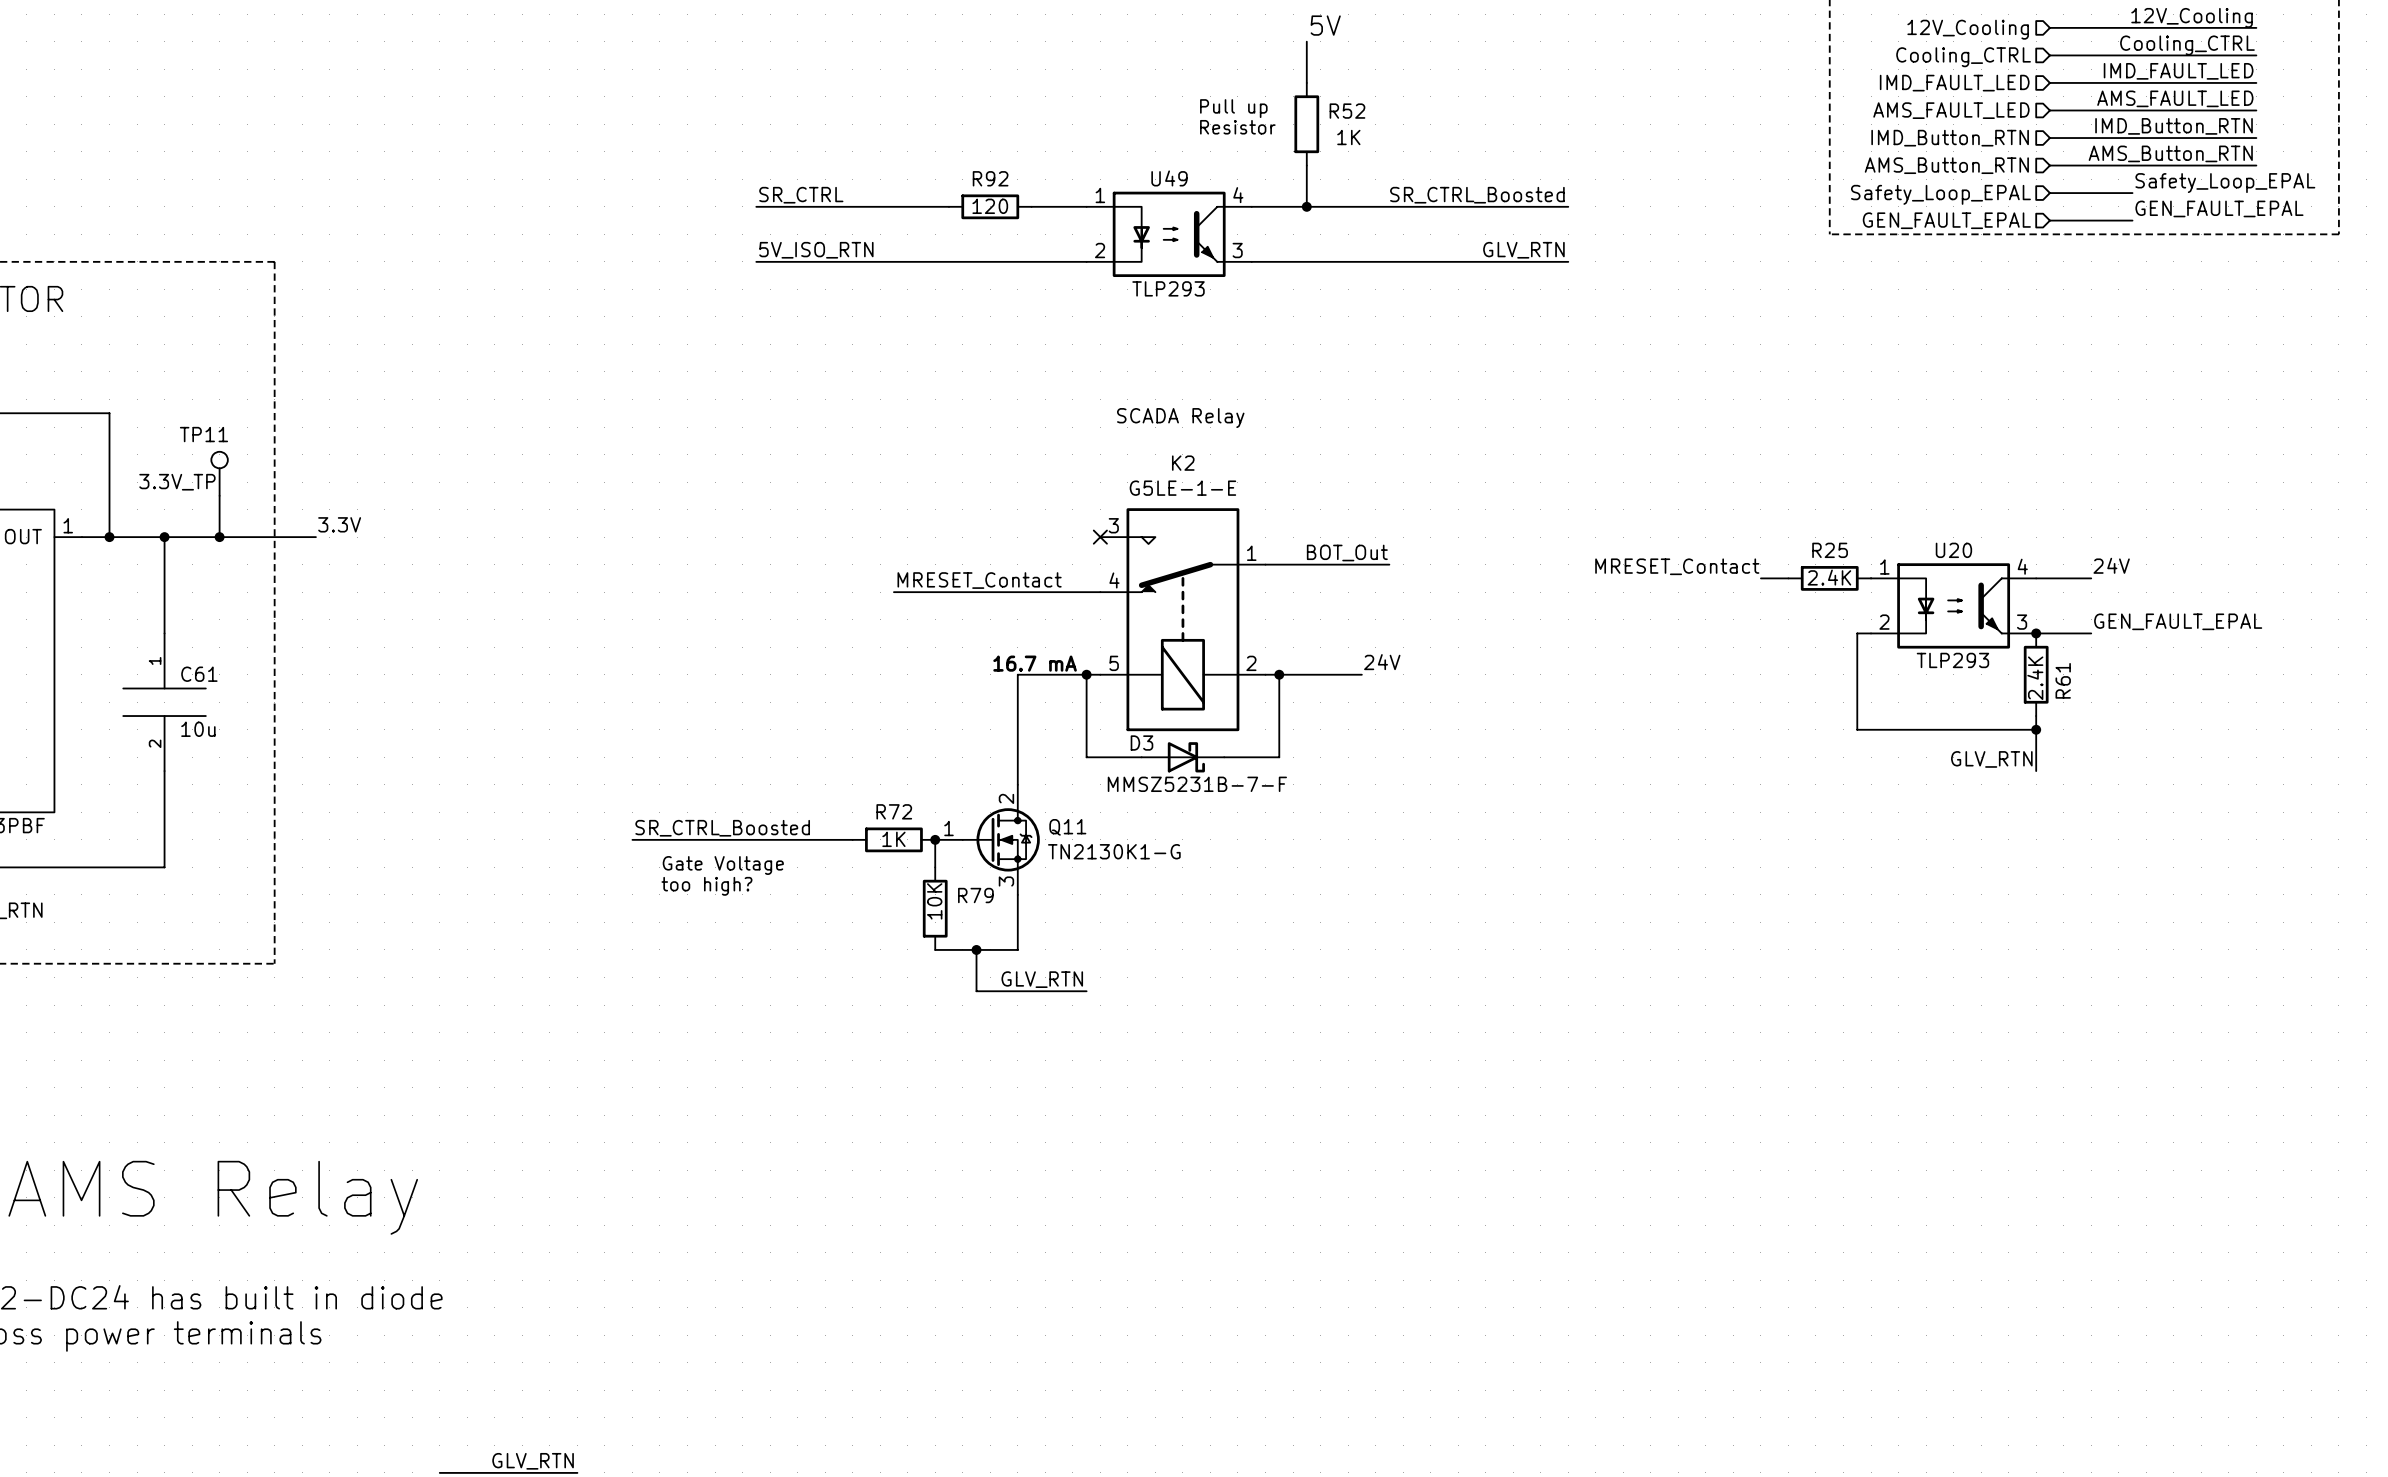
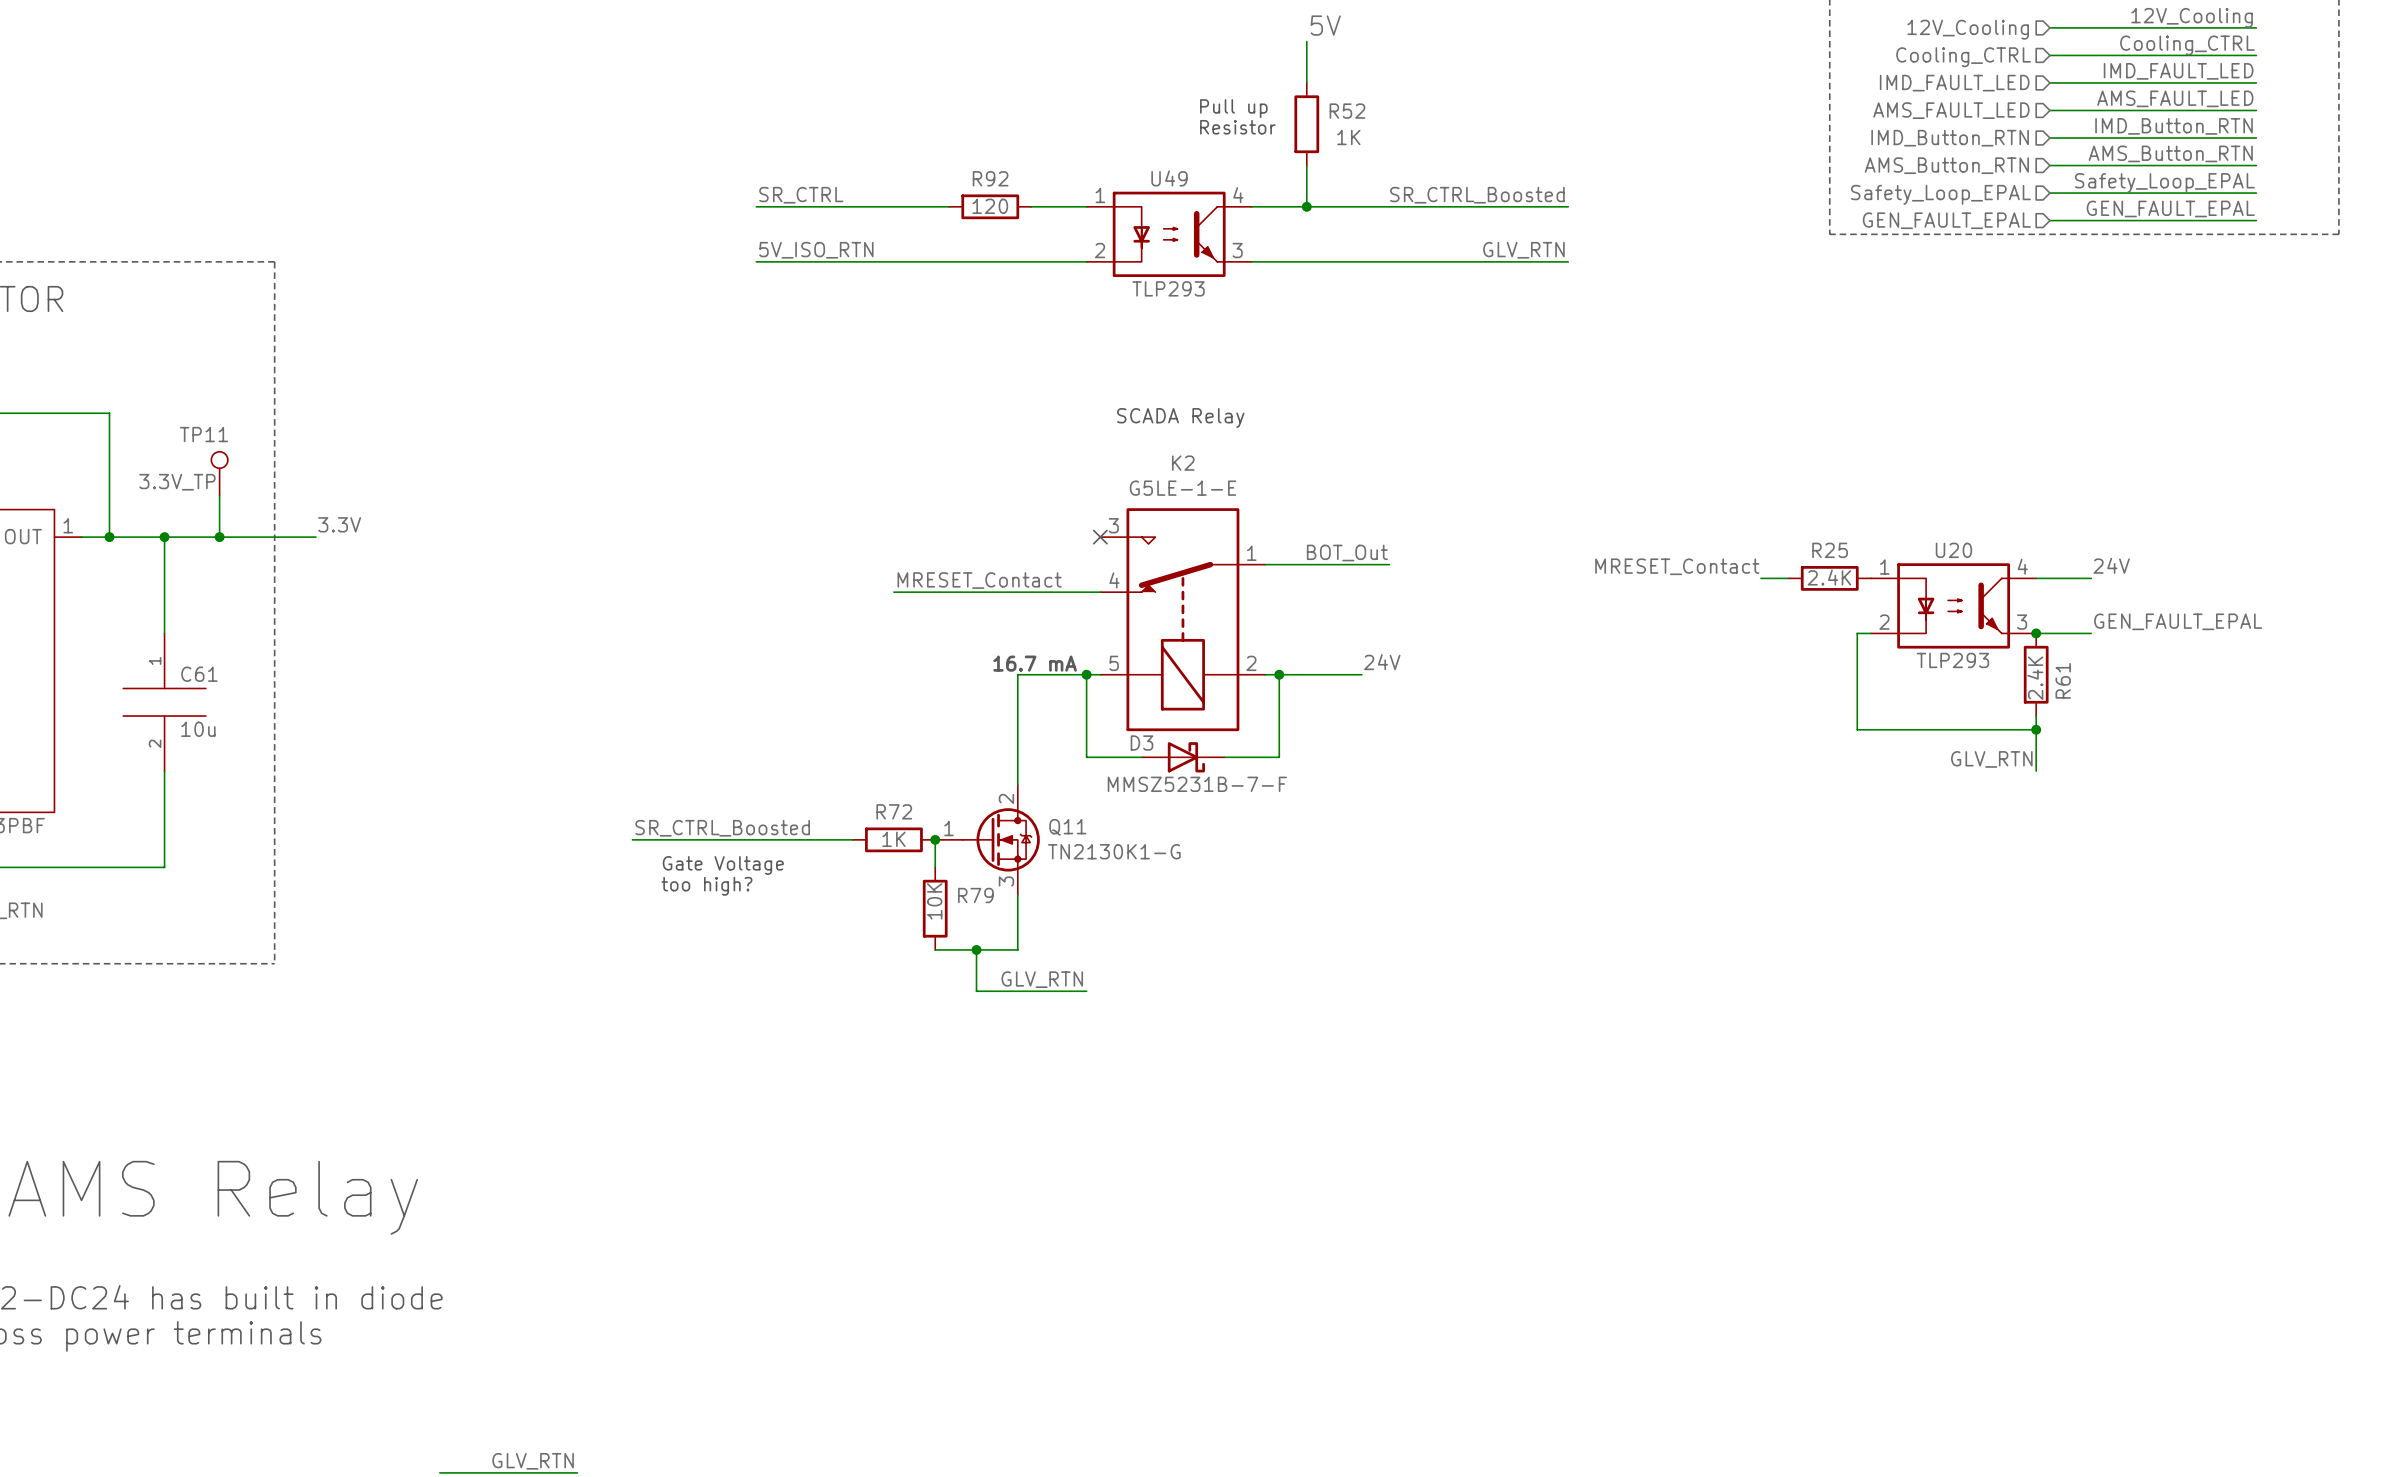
label position: Safety_Loop_EPAL (2225, 183) -> Safety_Loop_EPAL (2164, 183)
wire: none -> (2132, 193) (2256, 193)
label position: GEN_FAULT_EPAL (2219, 208) -> GEN_FAULT_EPAL (2170, 208)
wire: none -> (2132, 220) (2256, 220)

